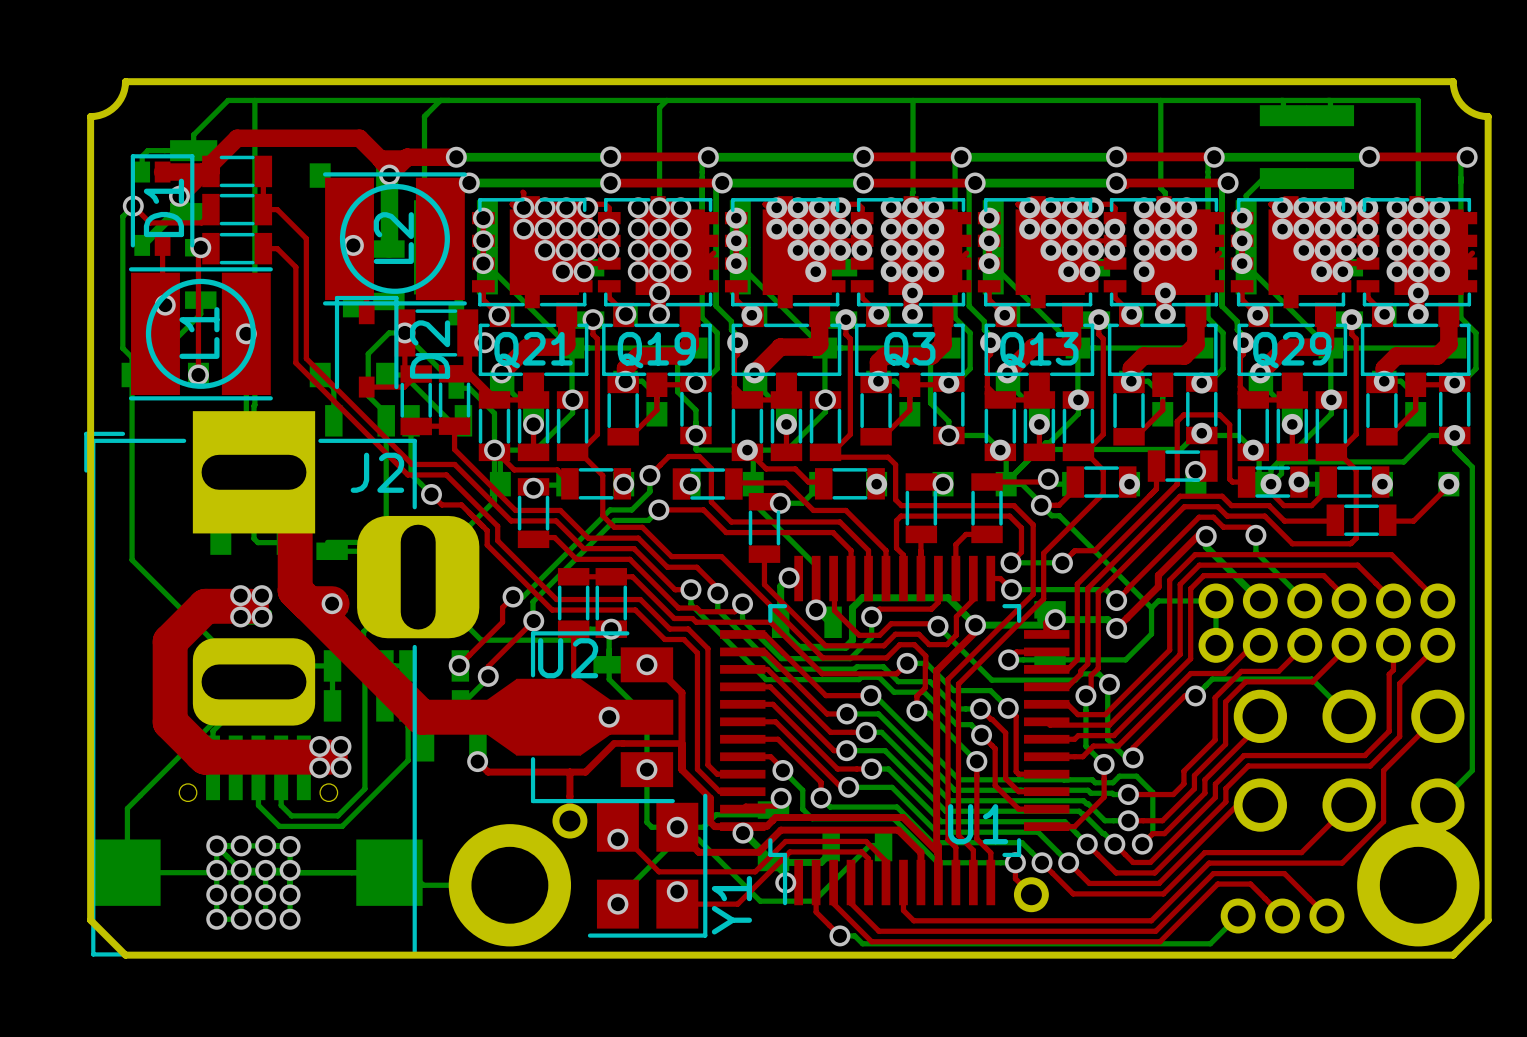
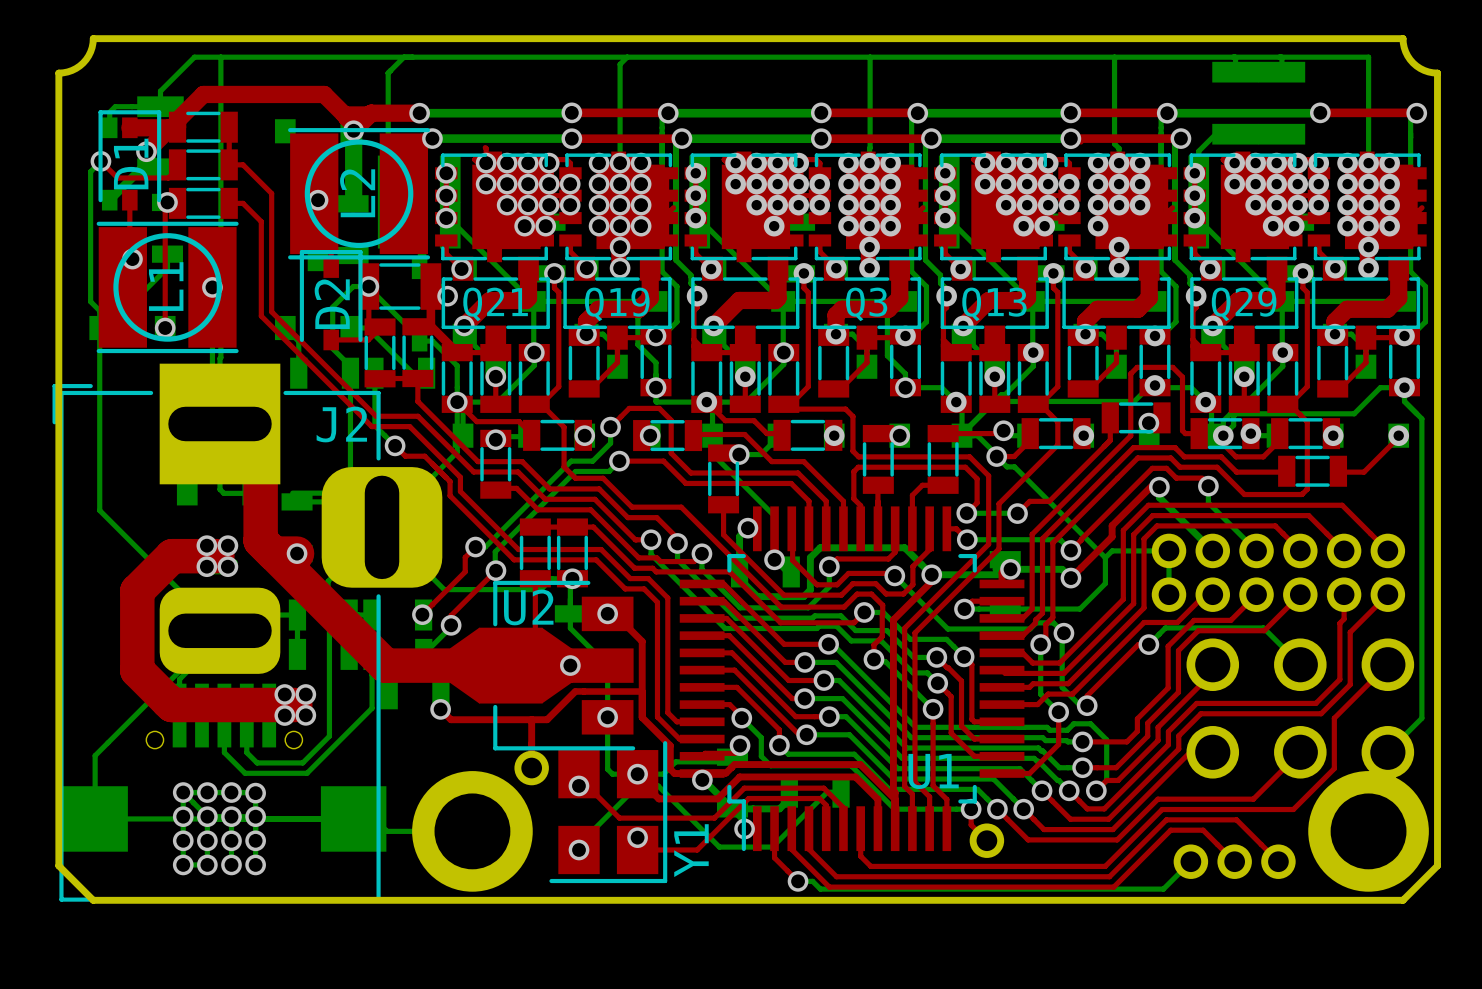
D2 name position: D2 (430, 349) -> D2 (332, 304)

